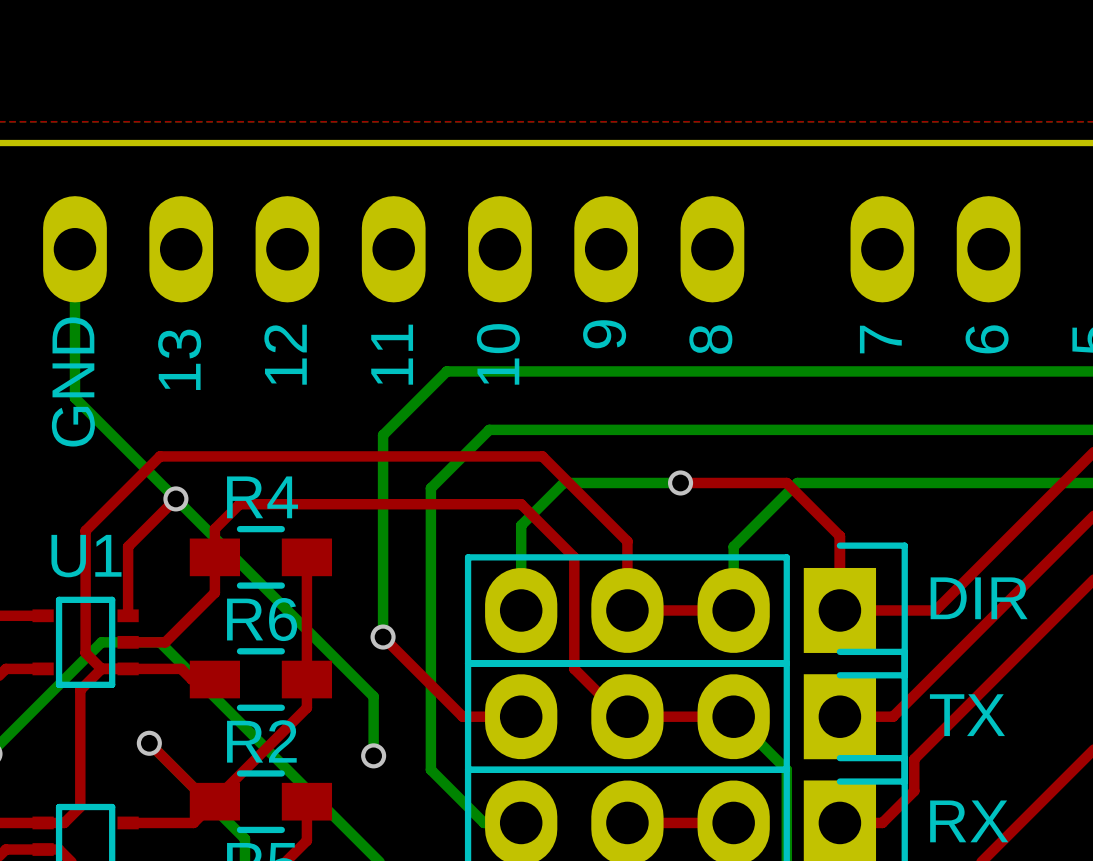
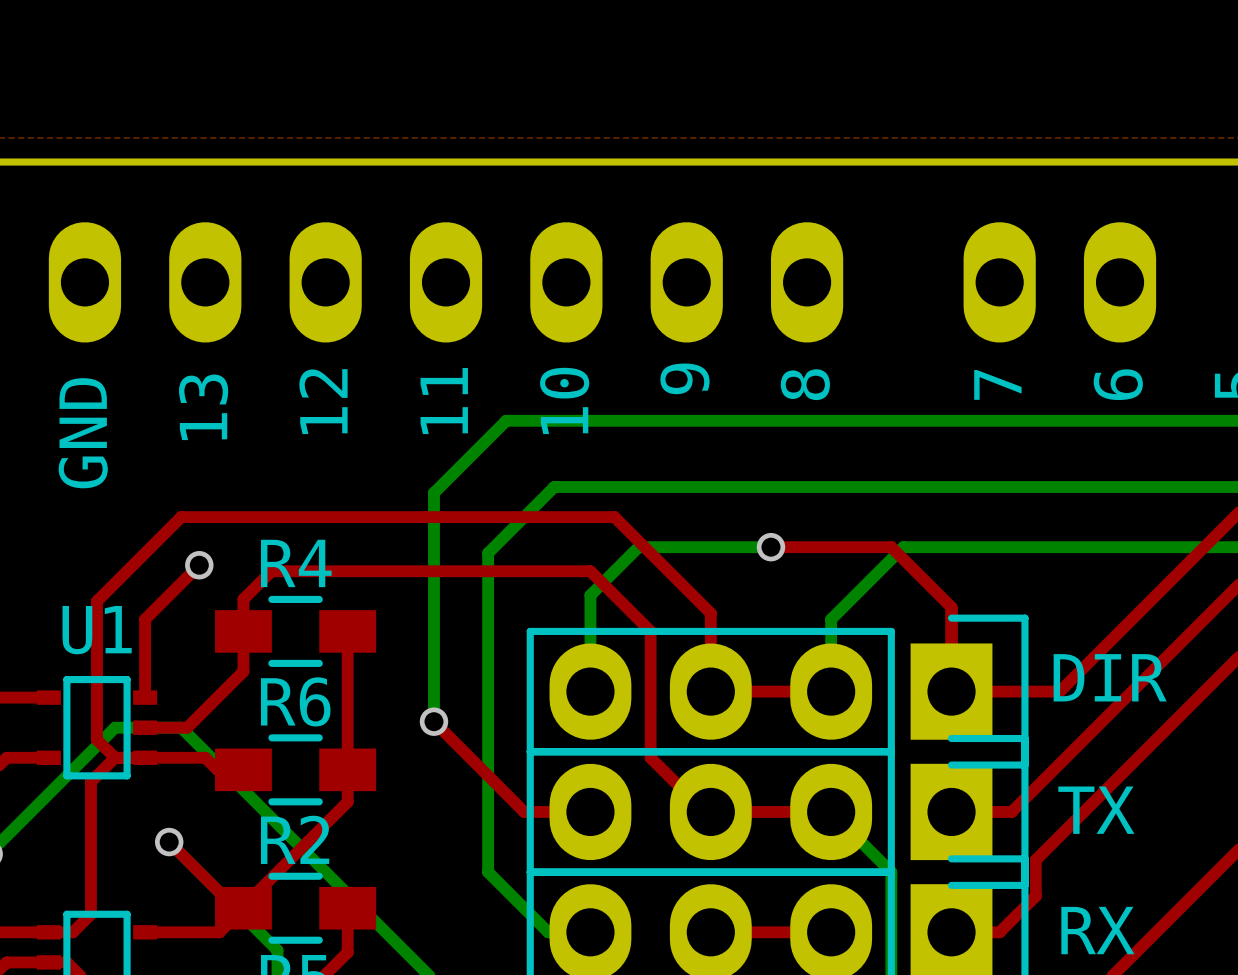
bottom track: (74, 249) (74, 397) (373, 696) (373, 755) -> none
via: (373, 755) -> none

